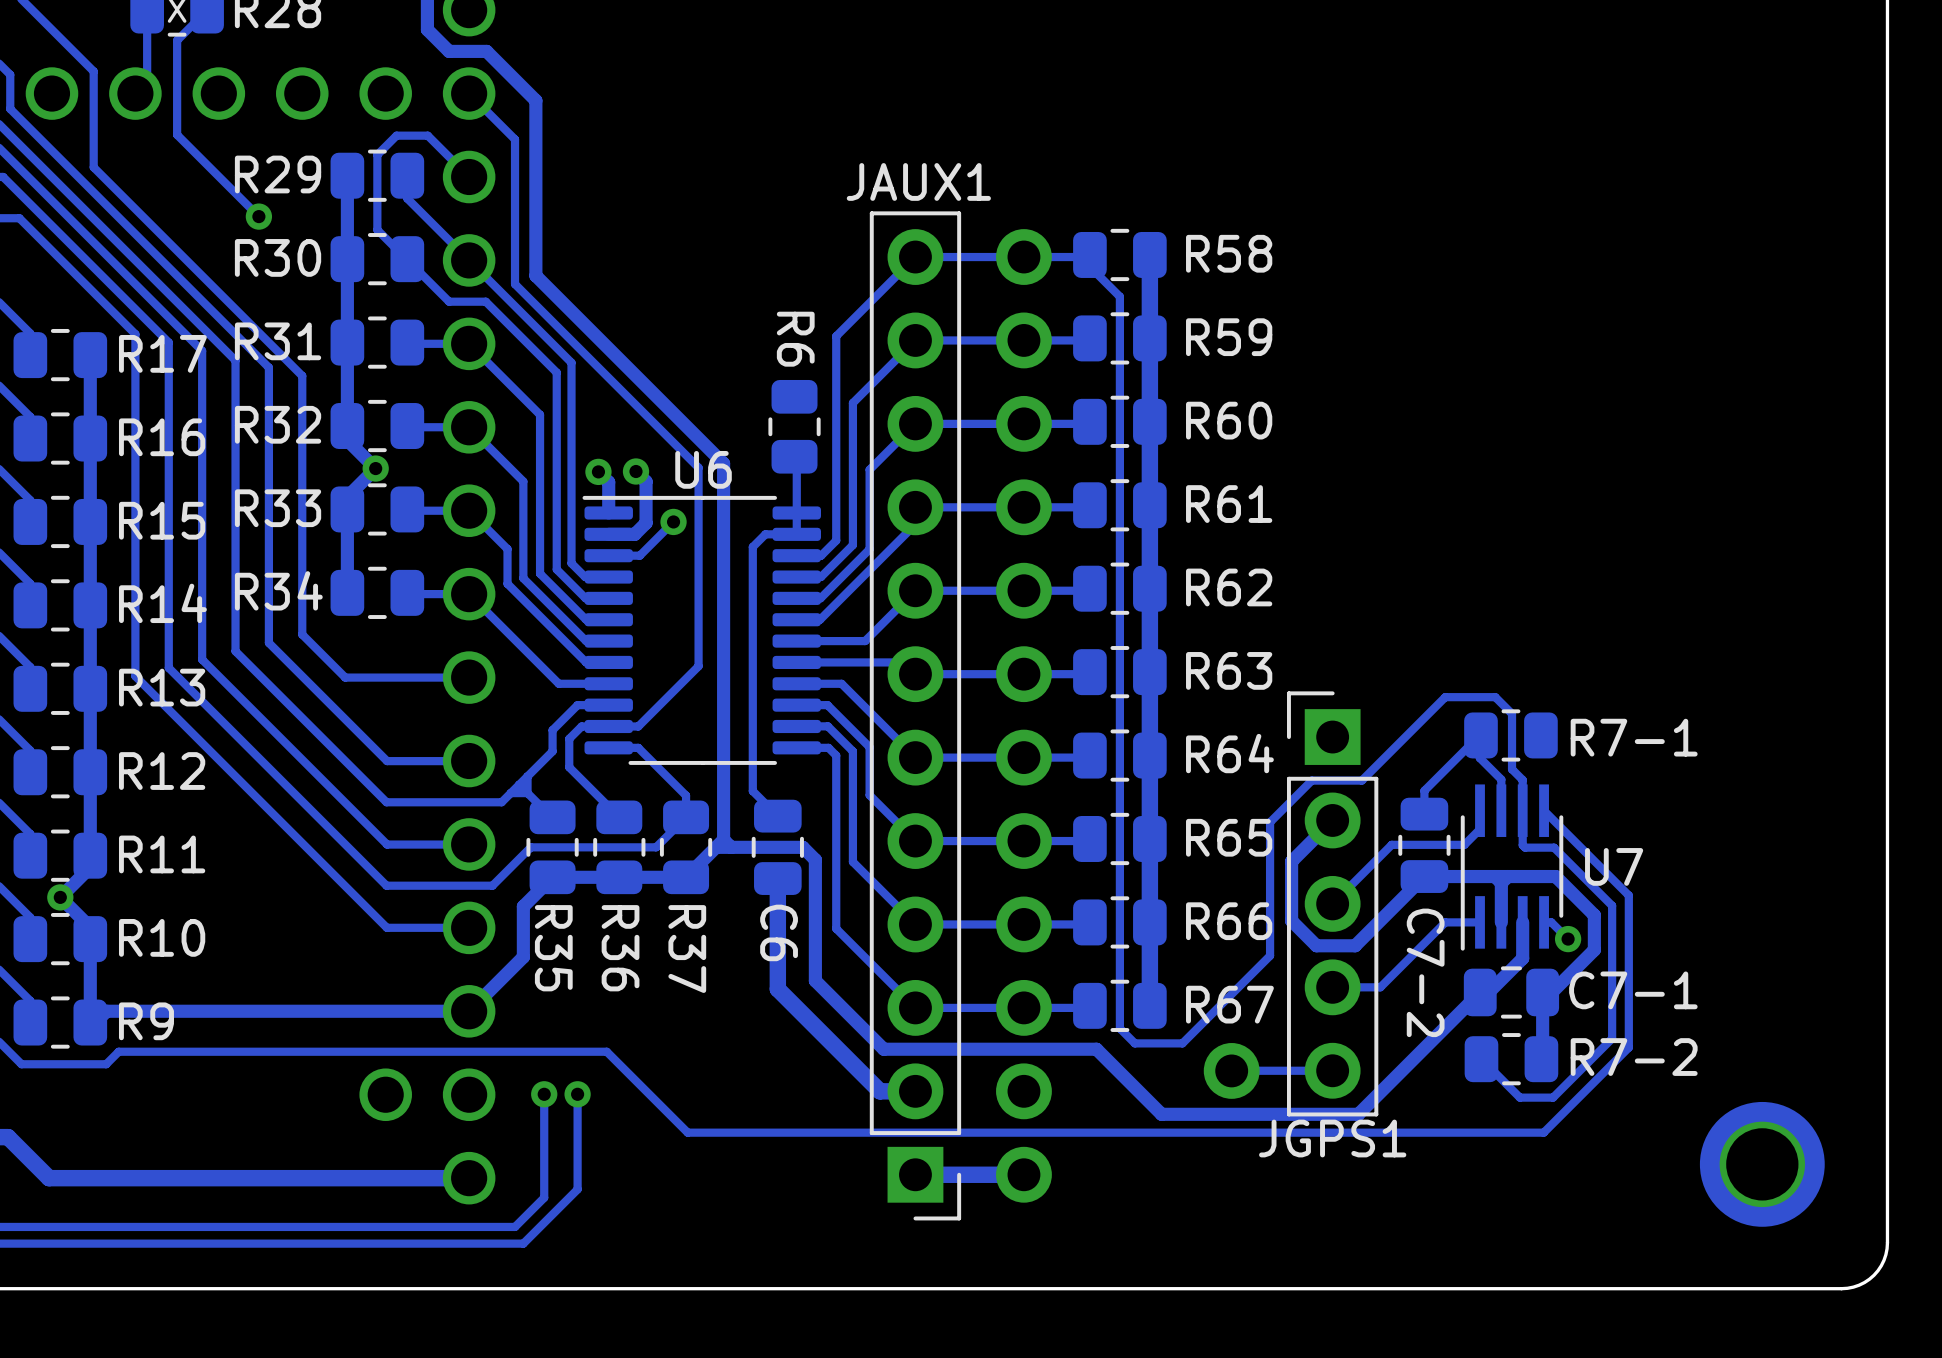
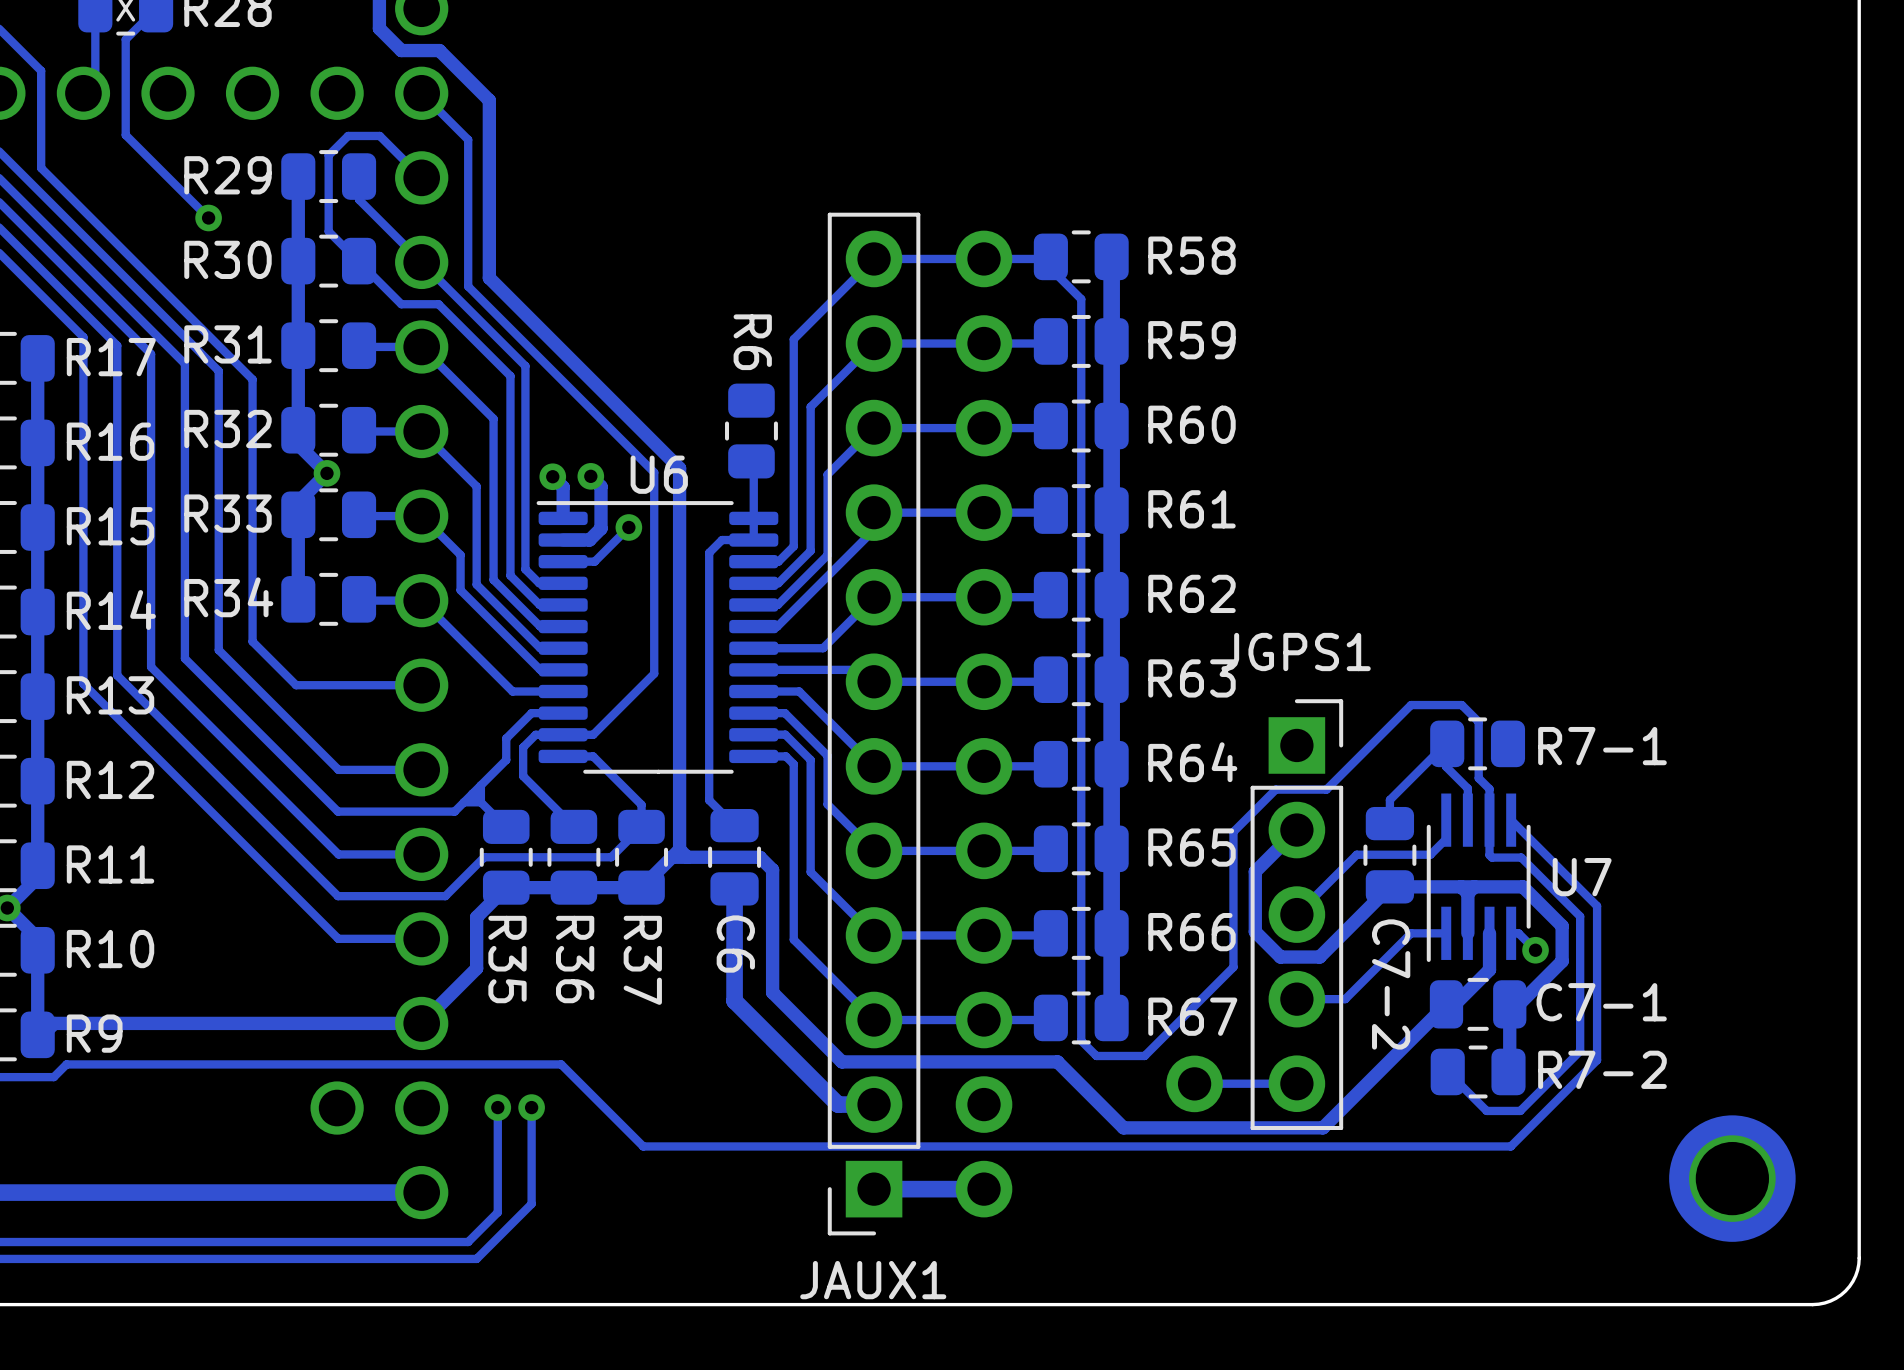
JAUX1 name position: JAUX1 (918, 181) -> JAUX1 (873, 1280)
JAUX1 footprint: [869, 211, 962, 1221] -> [827, 212, 921, 1236]
JGPS1 footprint: [1286, 691, 1379, 1117] -> [1250, 699, 1344, 1130]
JGPS1 name position: JGPS1 (1332, 1138) -> JGPS1 (1296, 652)

